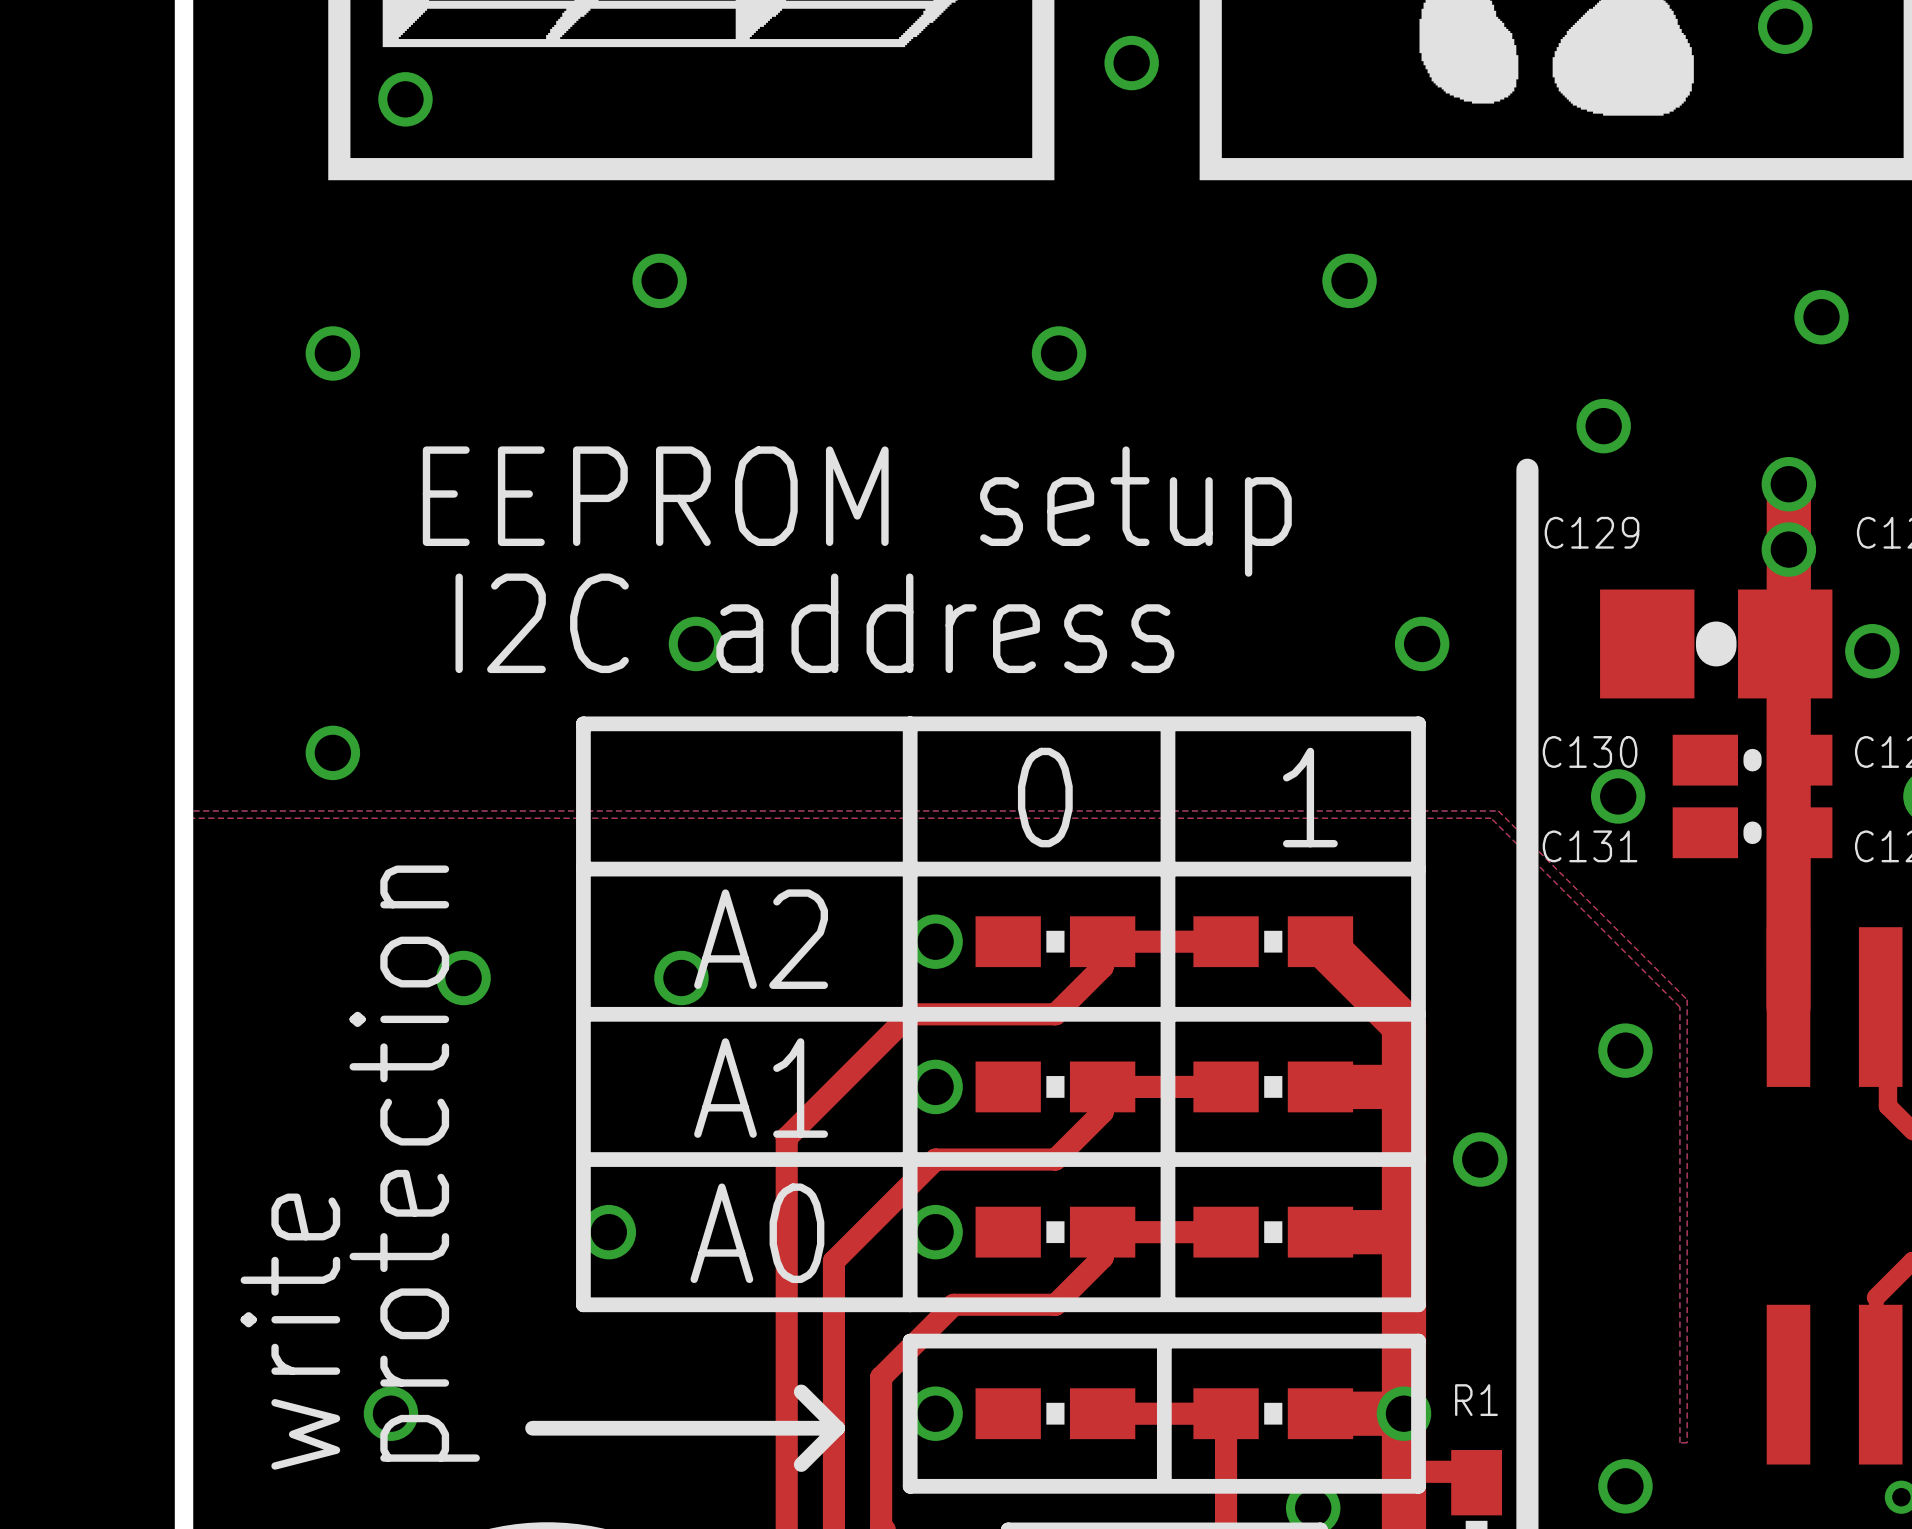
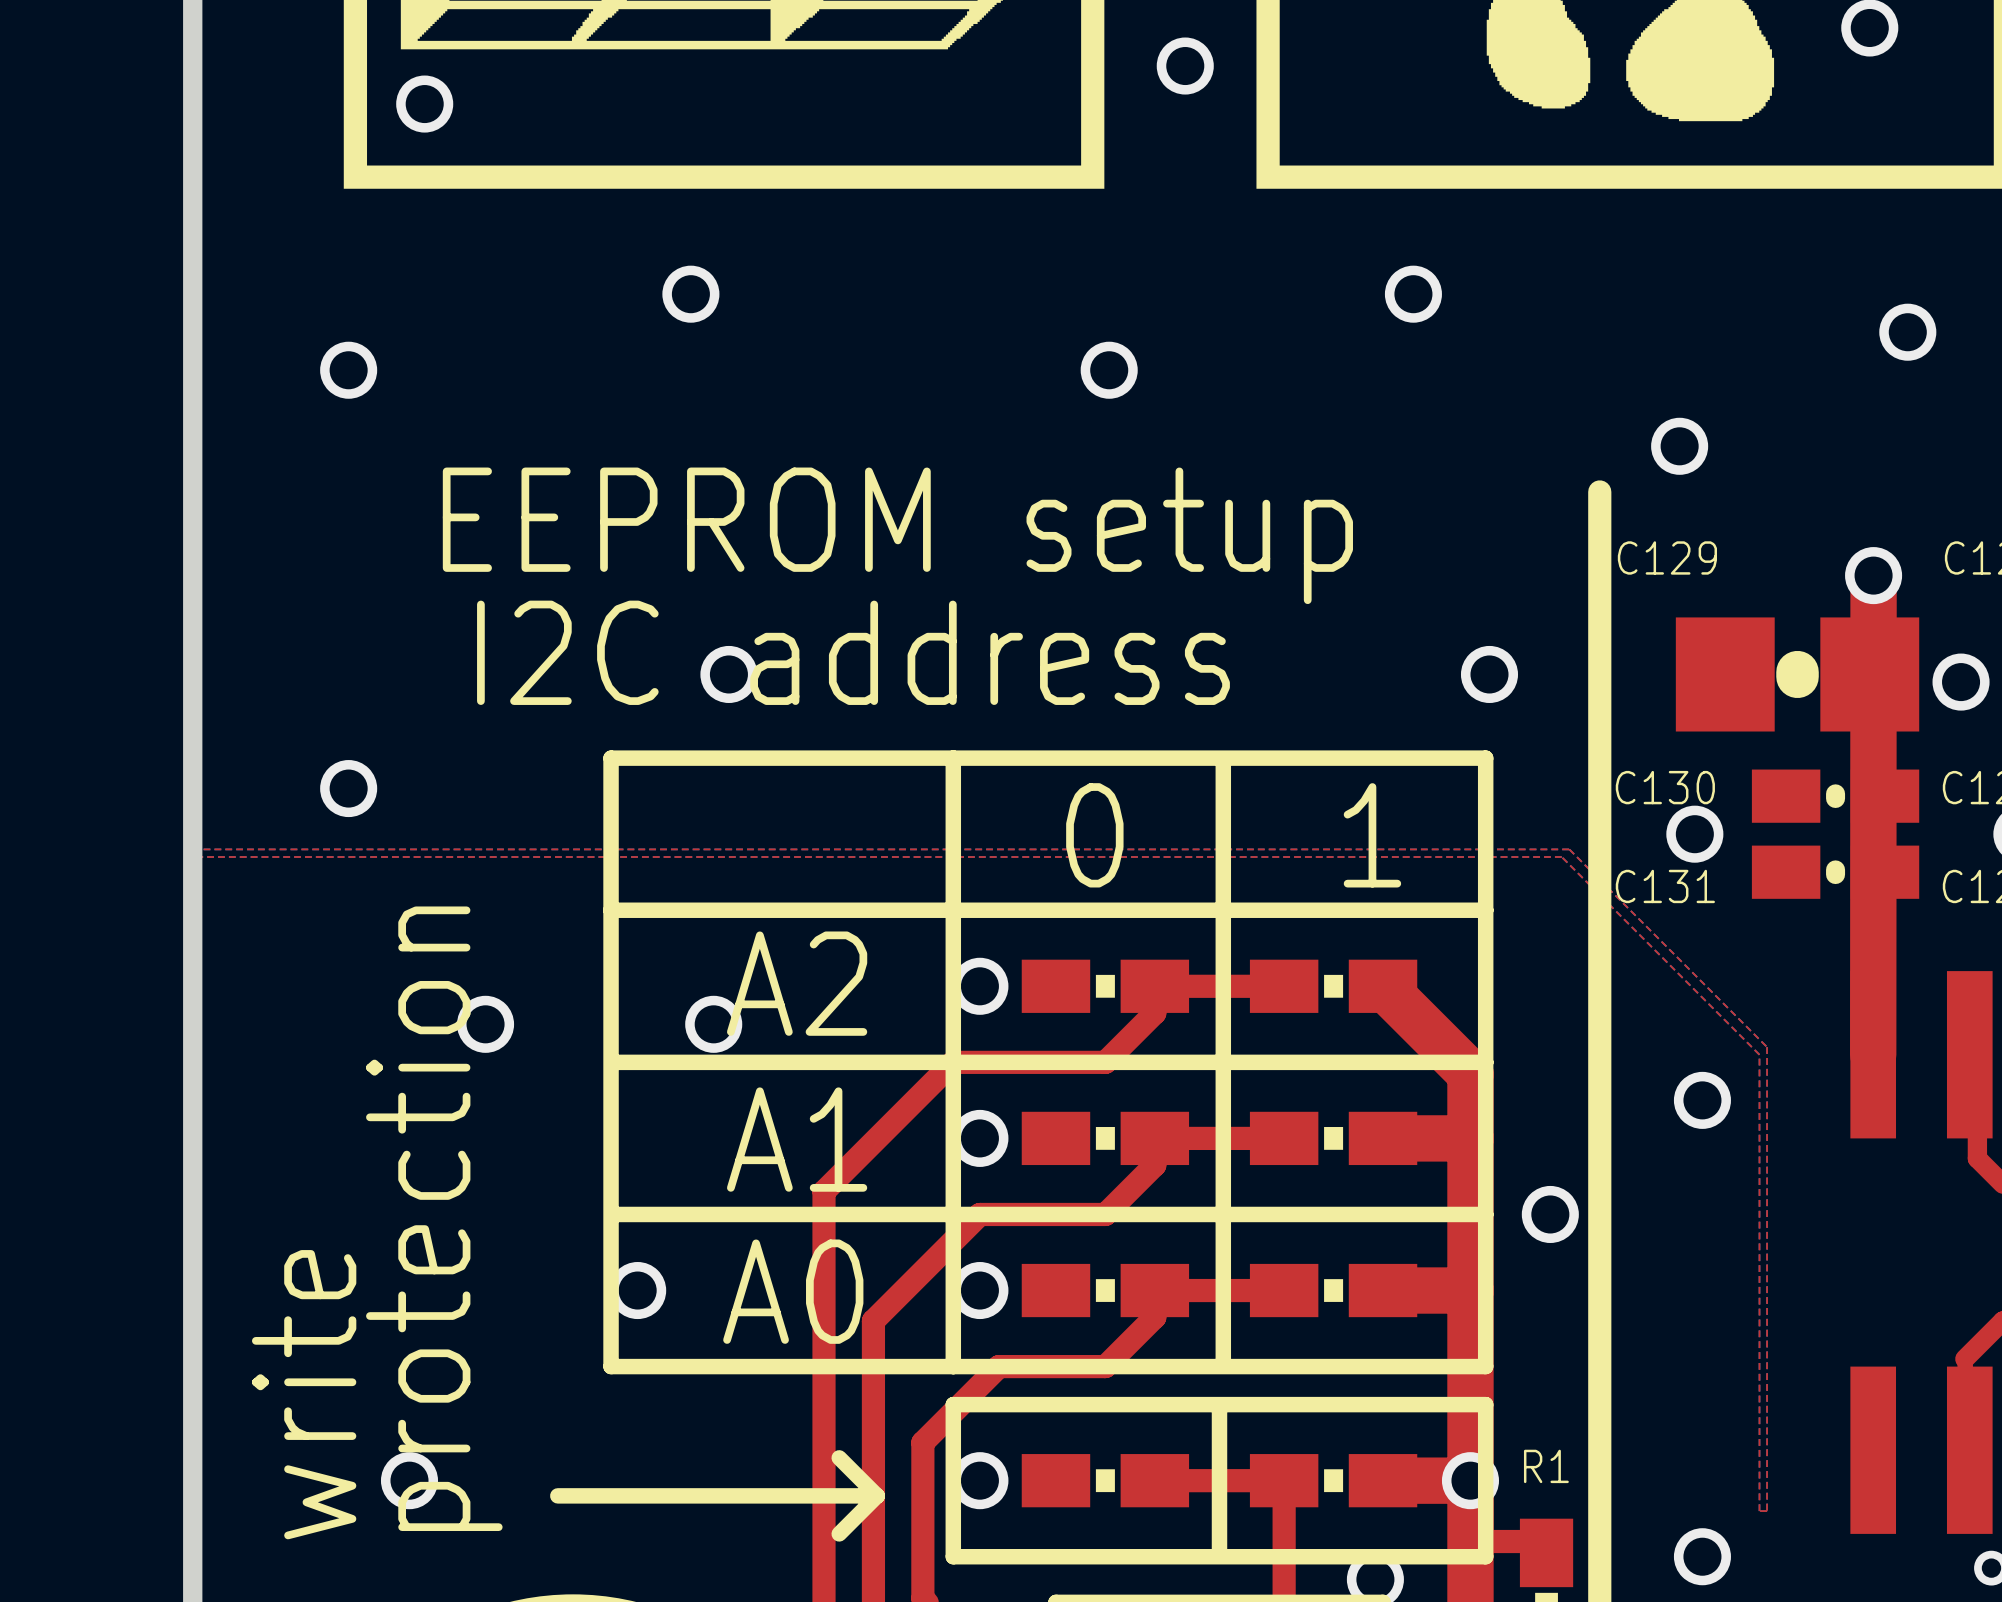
via: (1788, 484) -> none

